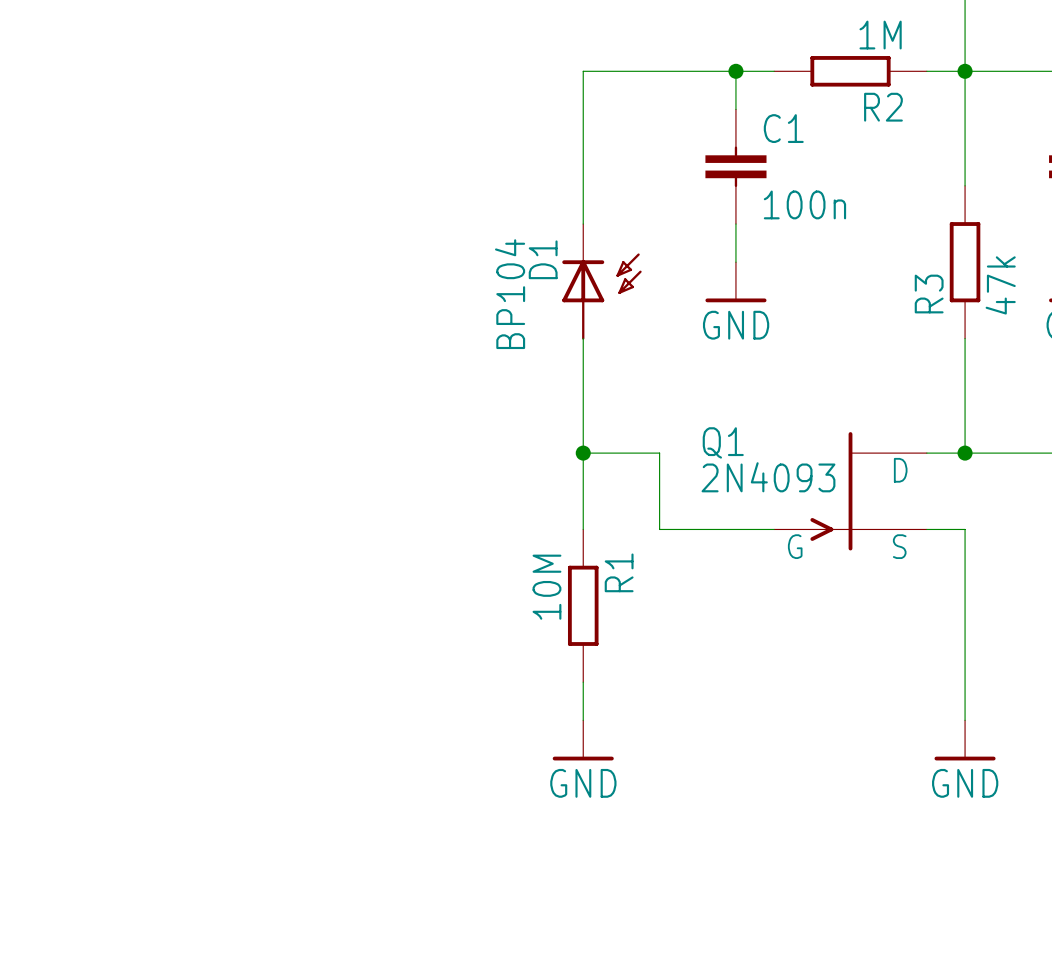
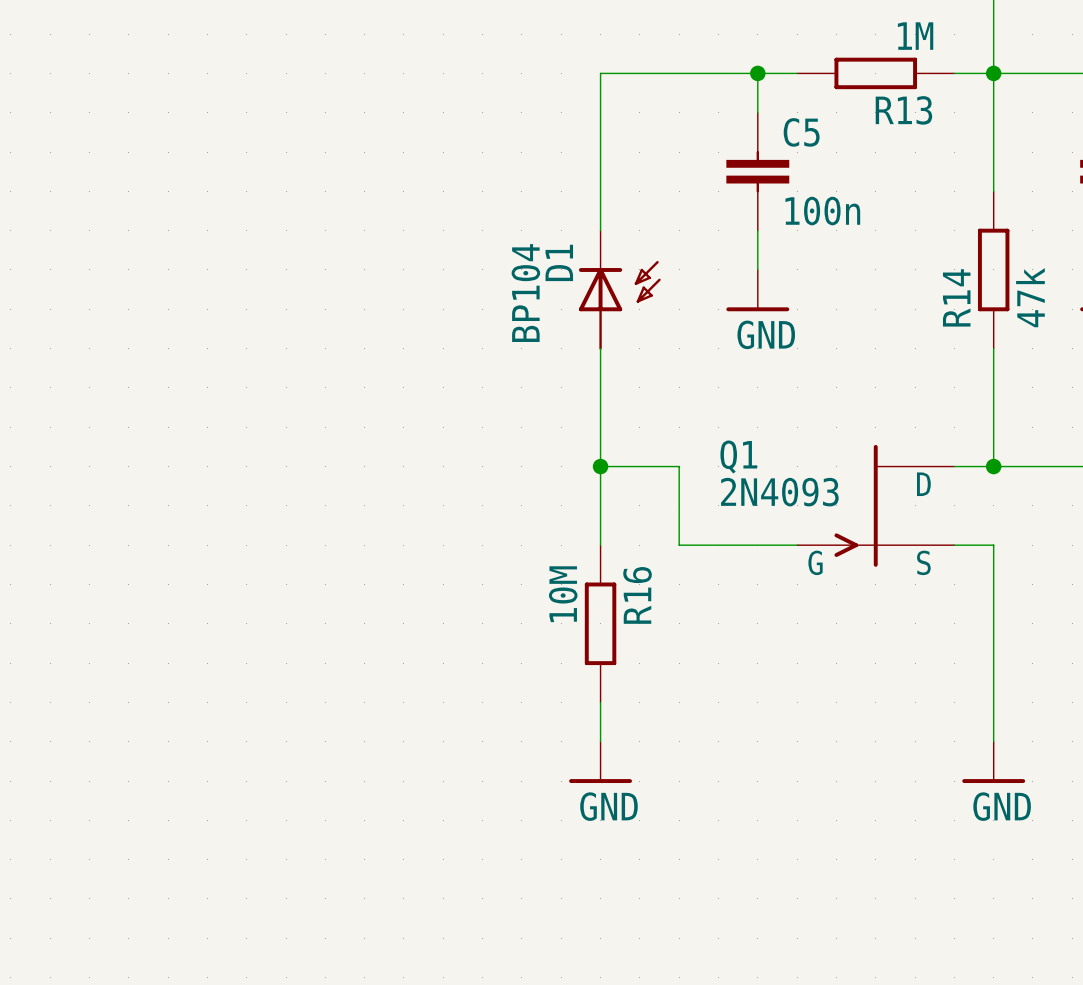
R2 name: R2 (883, 107) -> R13 (903, 110)
C1 name: C1 (783, 128) -> C5 (801, 132)
R3 name: R3 (929, 294) -> R14 (956, 297)
R1 name: R1 (619, 572) -> R16 (637, 595)

